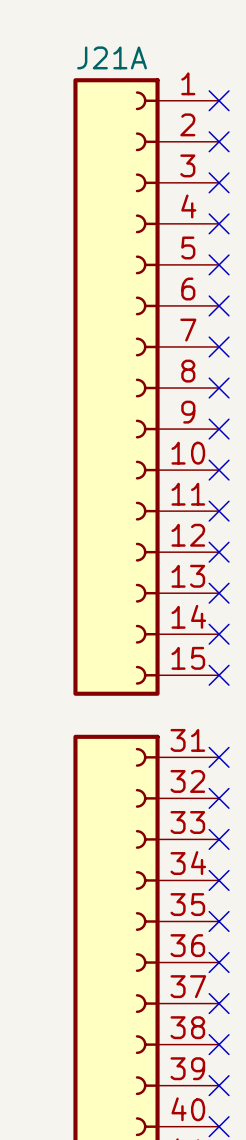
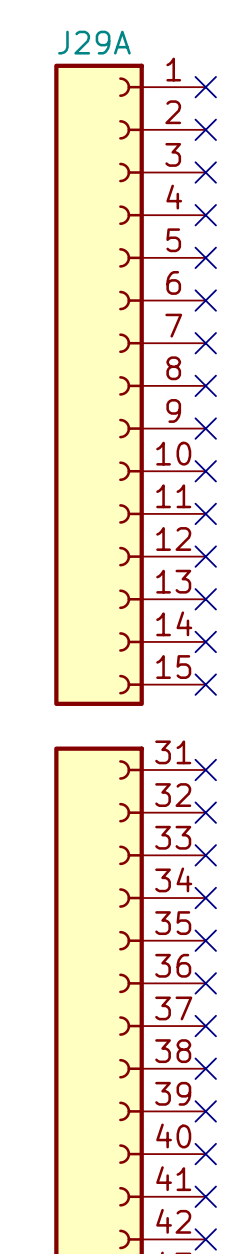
J21A name: J21A (112, 57) -> J29A (94, 42)

